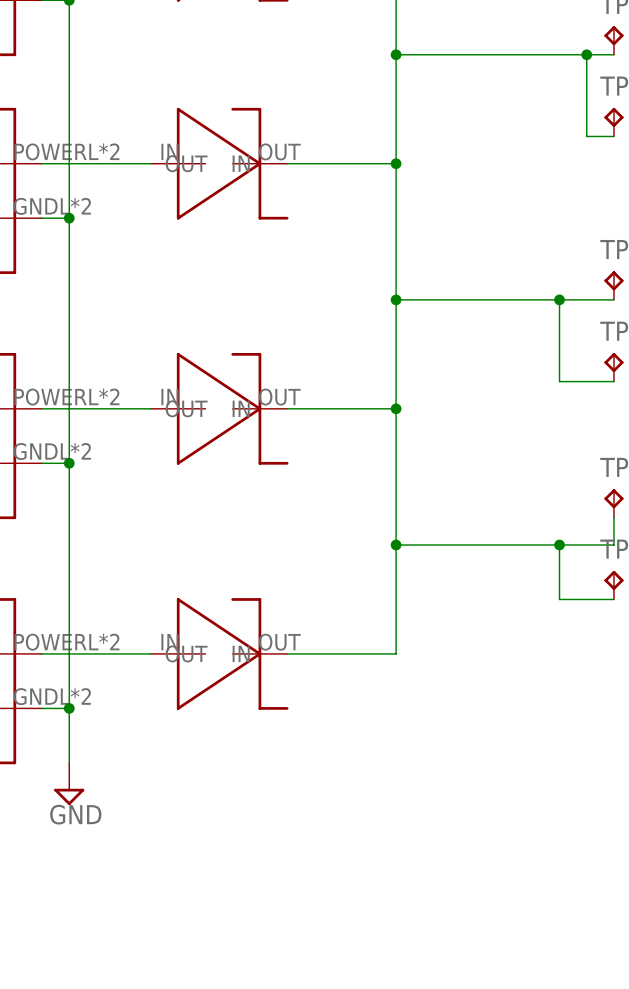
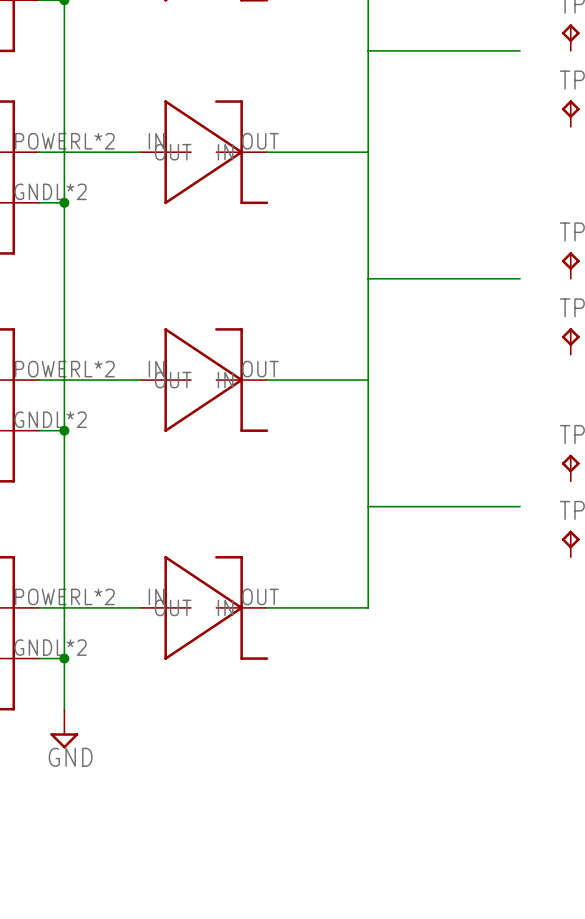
junction: (396, 54) -> none
wire: (559, 54) (613, 54) -> none
wire: (586, 54) (586, 136) (613, 136) -> none
junction: (586, 54) -> none
junction: (396, 163) -> none
junction: (396, 299) -> none
junction: (559, 299) -> none
wire: (613, 299) (559, 299) (559, 381) (613, 381) -> none
junction: (396, 408) -> none
wire: (613, 517) (613, 545) (559, 545) (559, 599) (613, 599) -> none
junction: (396, 545) -> none
junction: (559, 545) -> none

